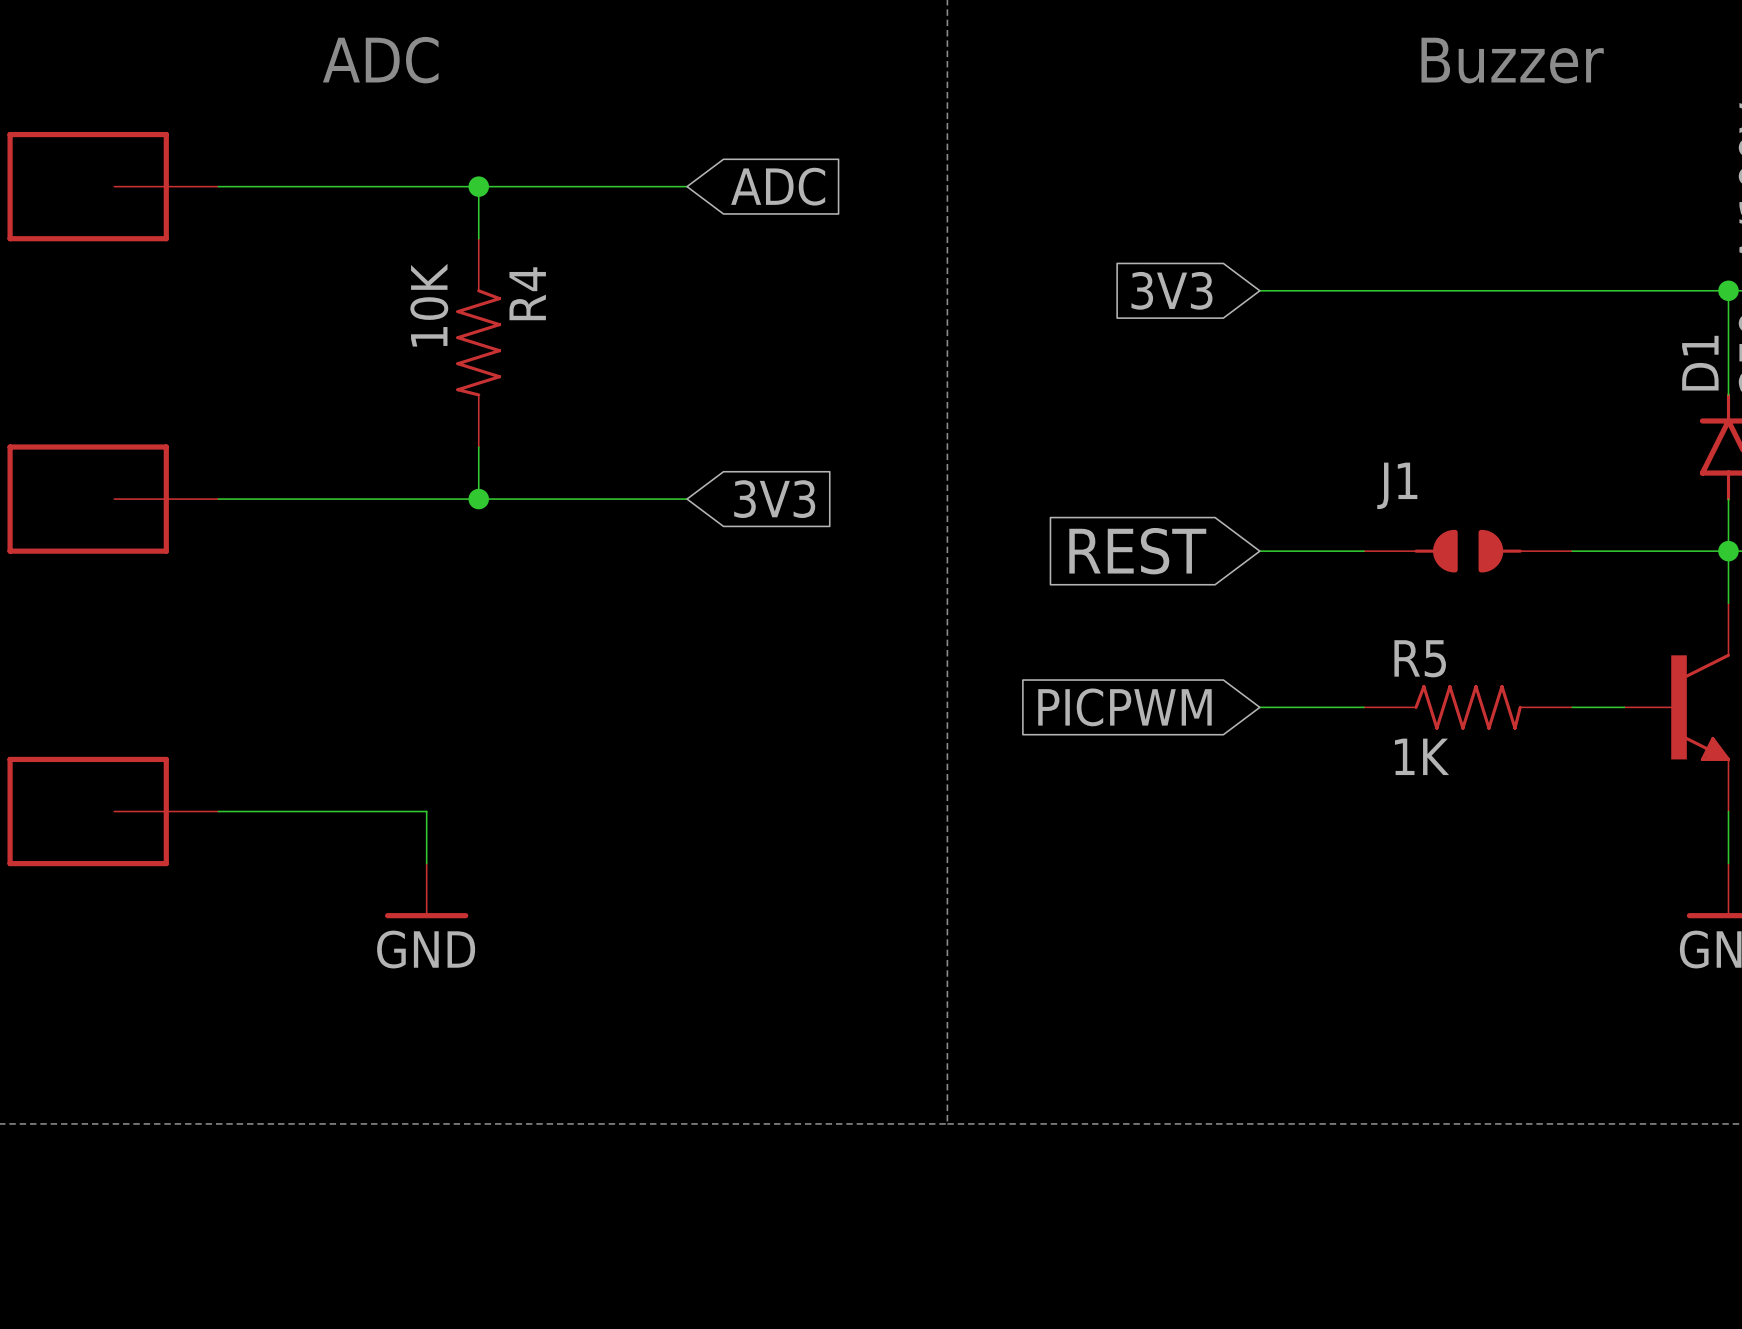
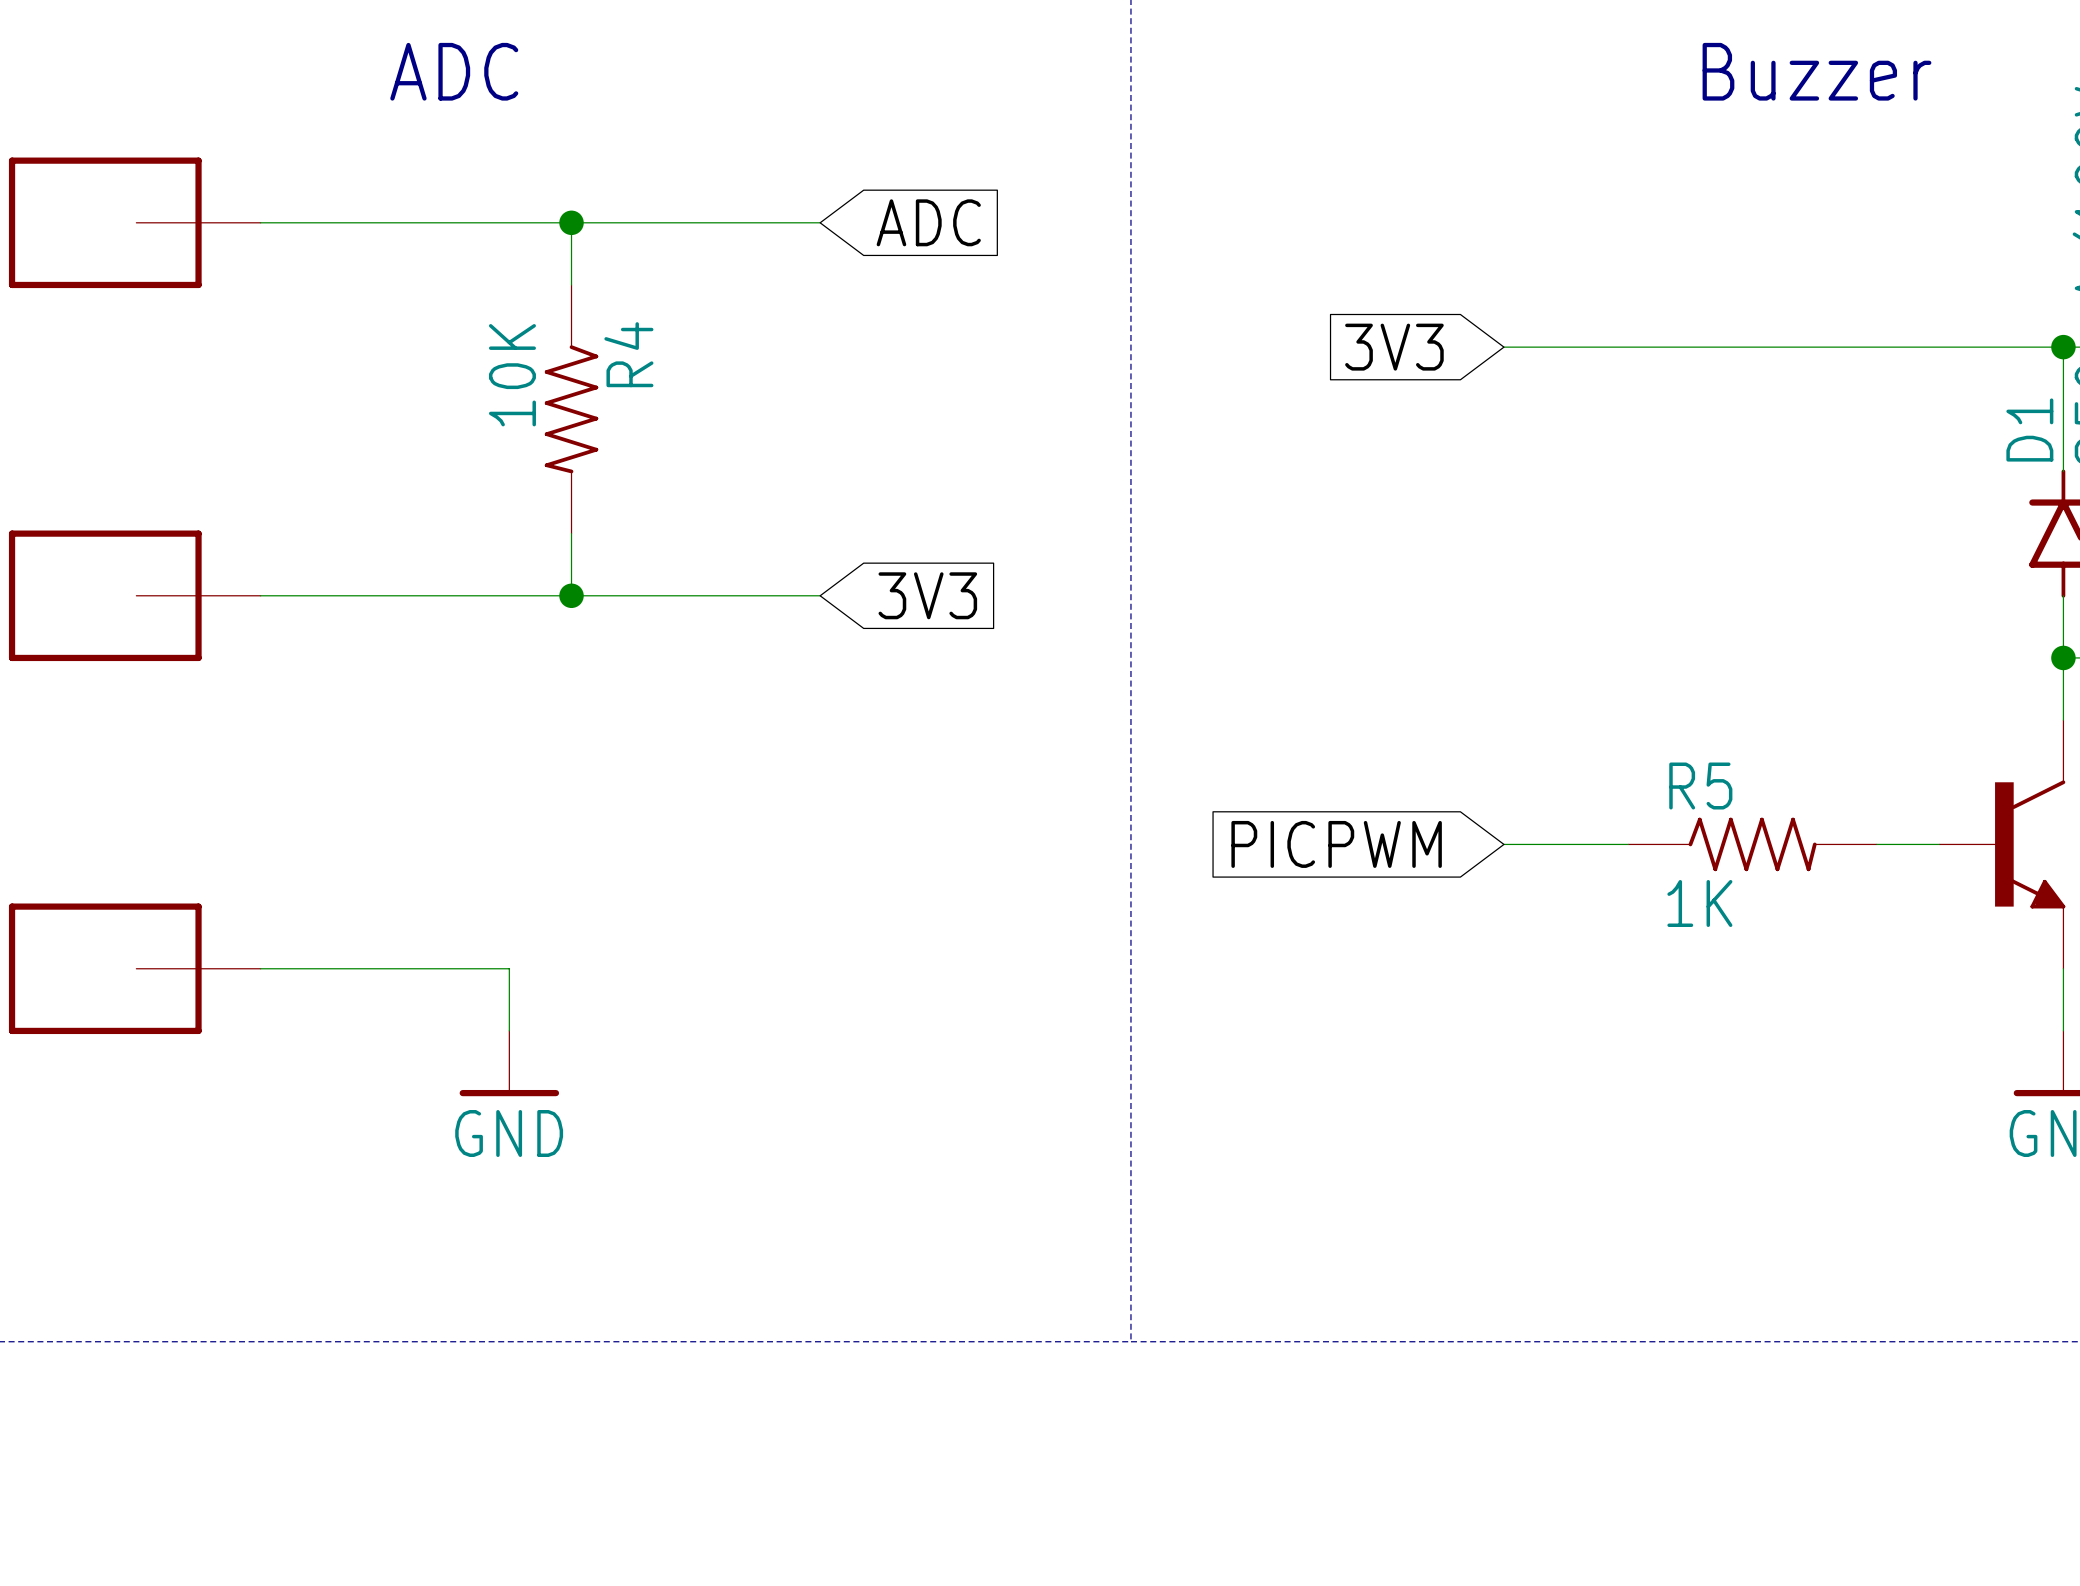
global label: REST (1137, 551) -> none
wire: (1259, 551) (1363, 551) -> none
J1: (1468, 551) -> none
wire: (1572, 551) (1728, 551) -> none

